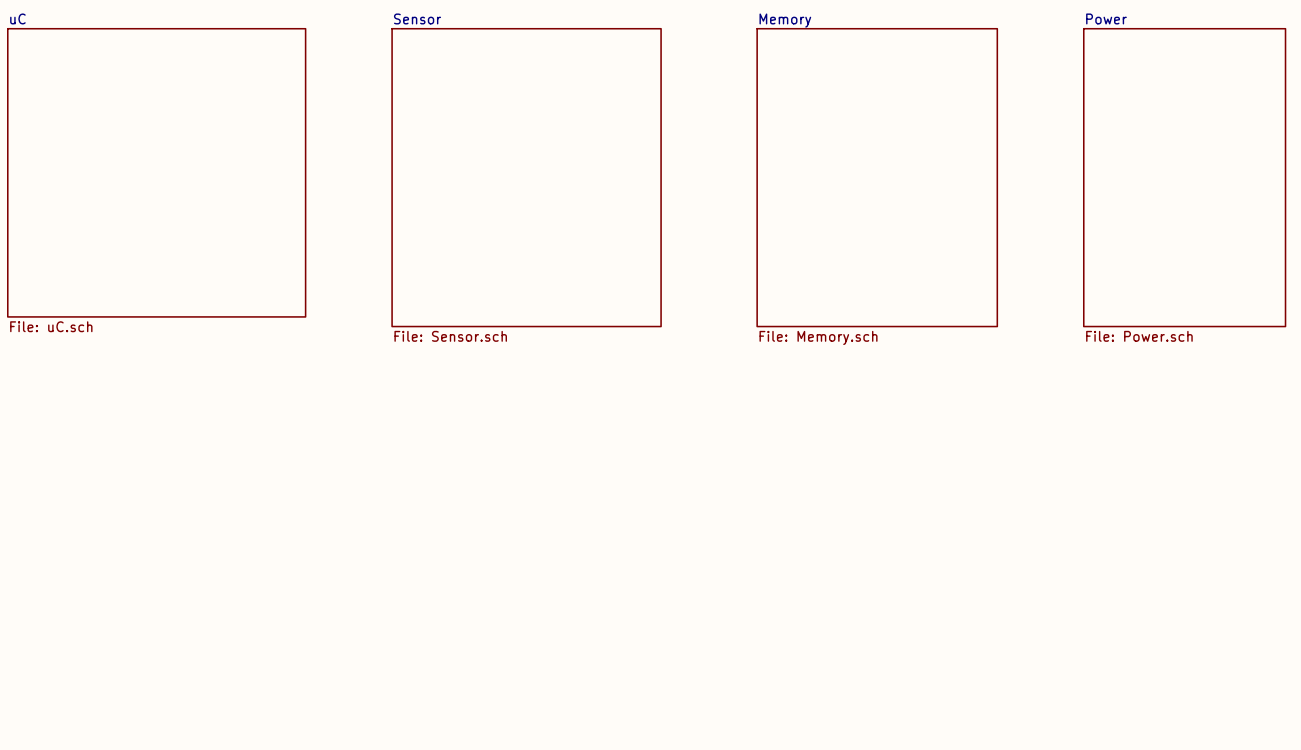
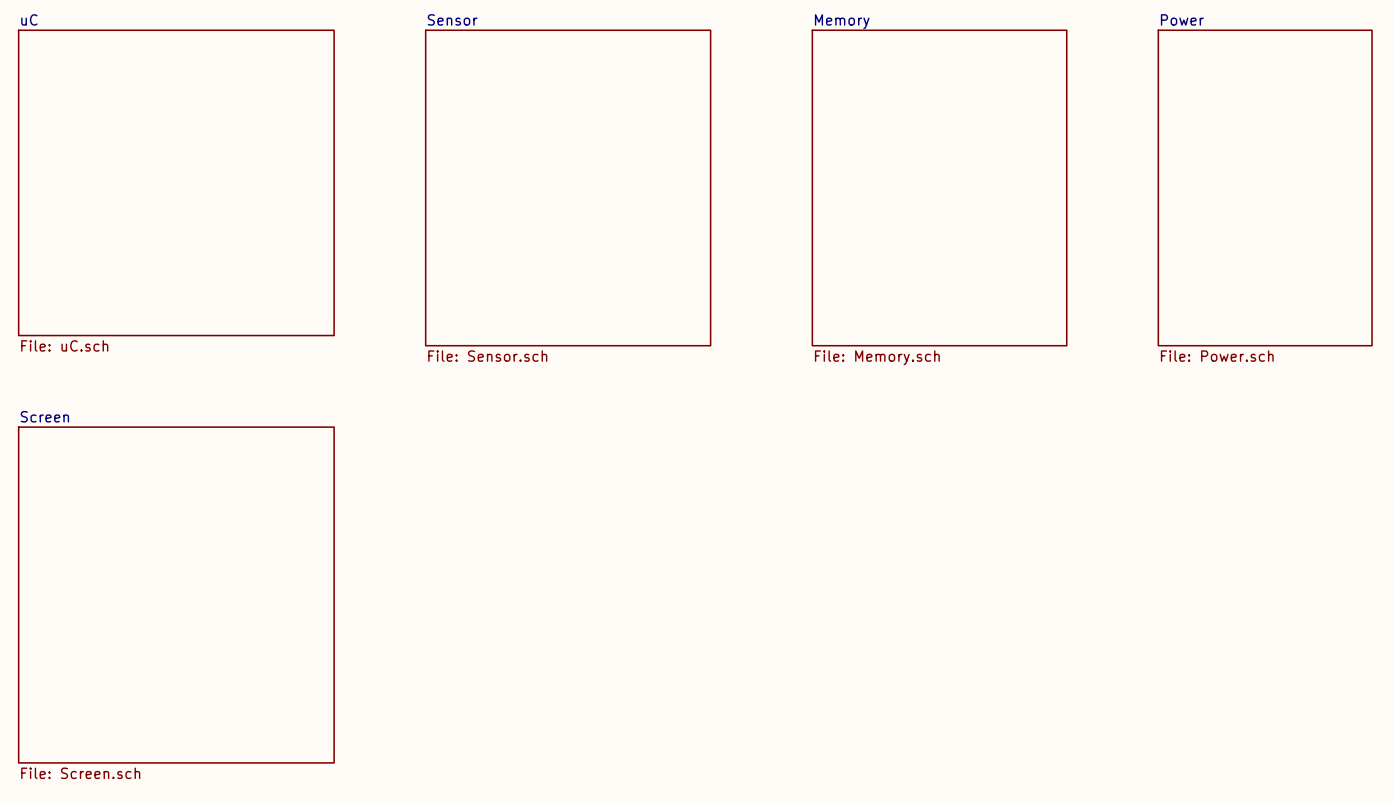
sheet Screen: none -> File: Screen.sch (176, 595)

